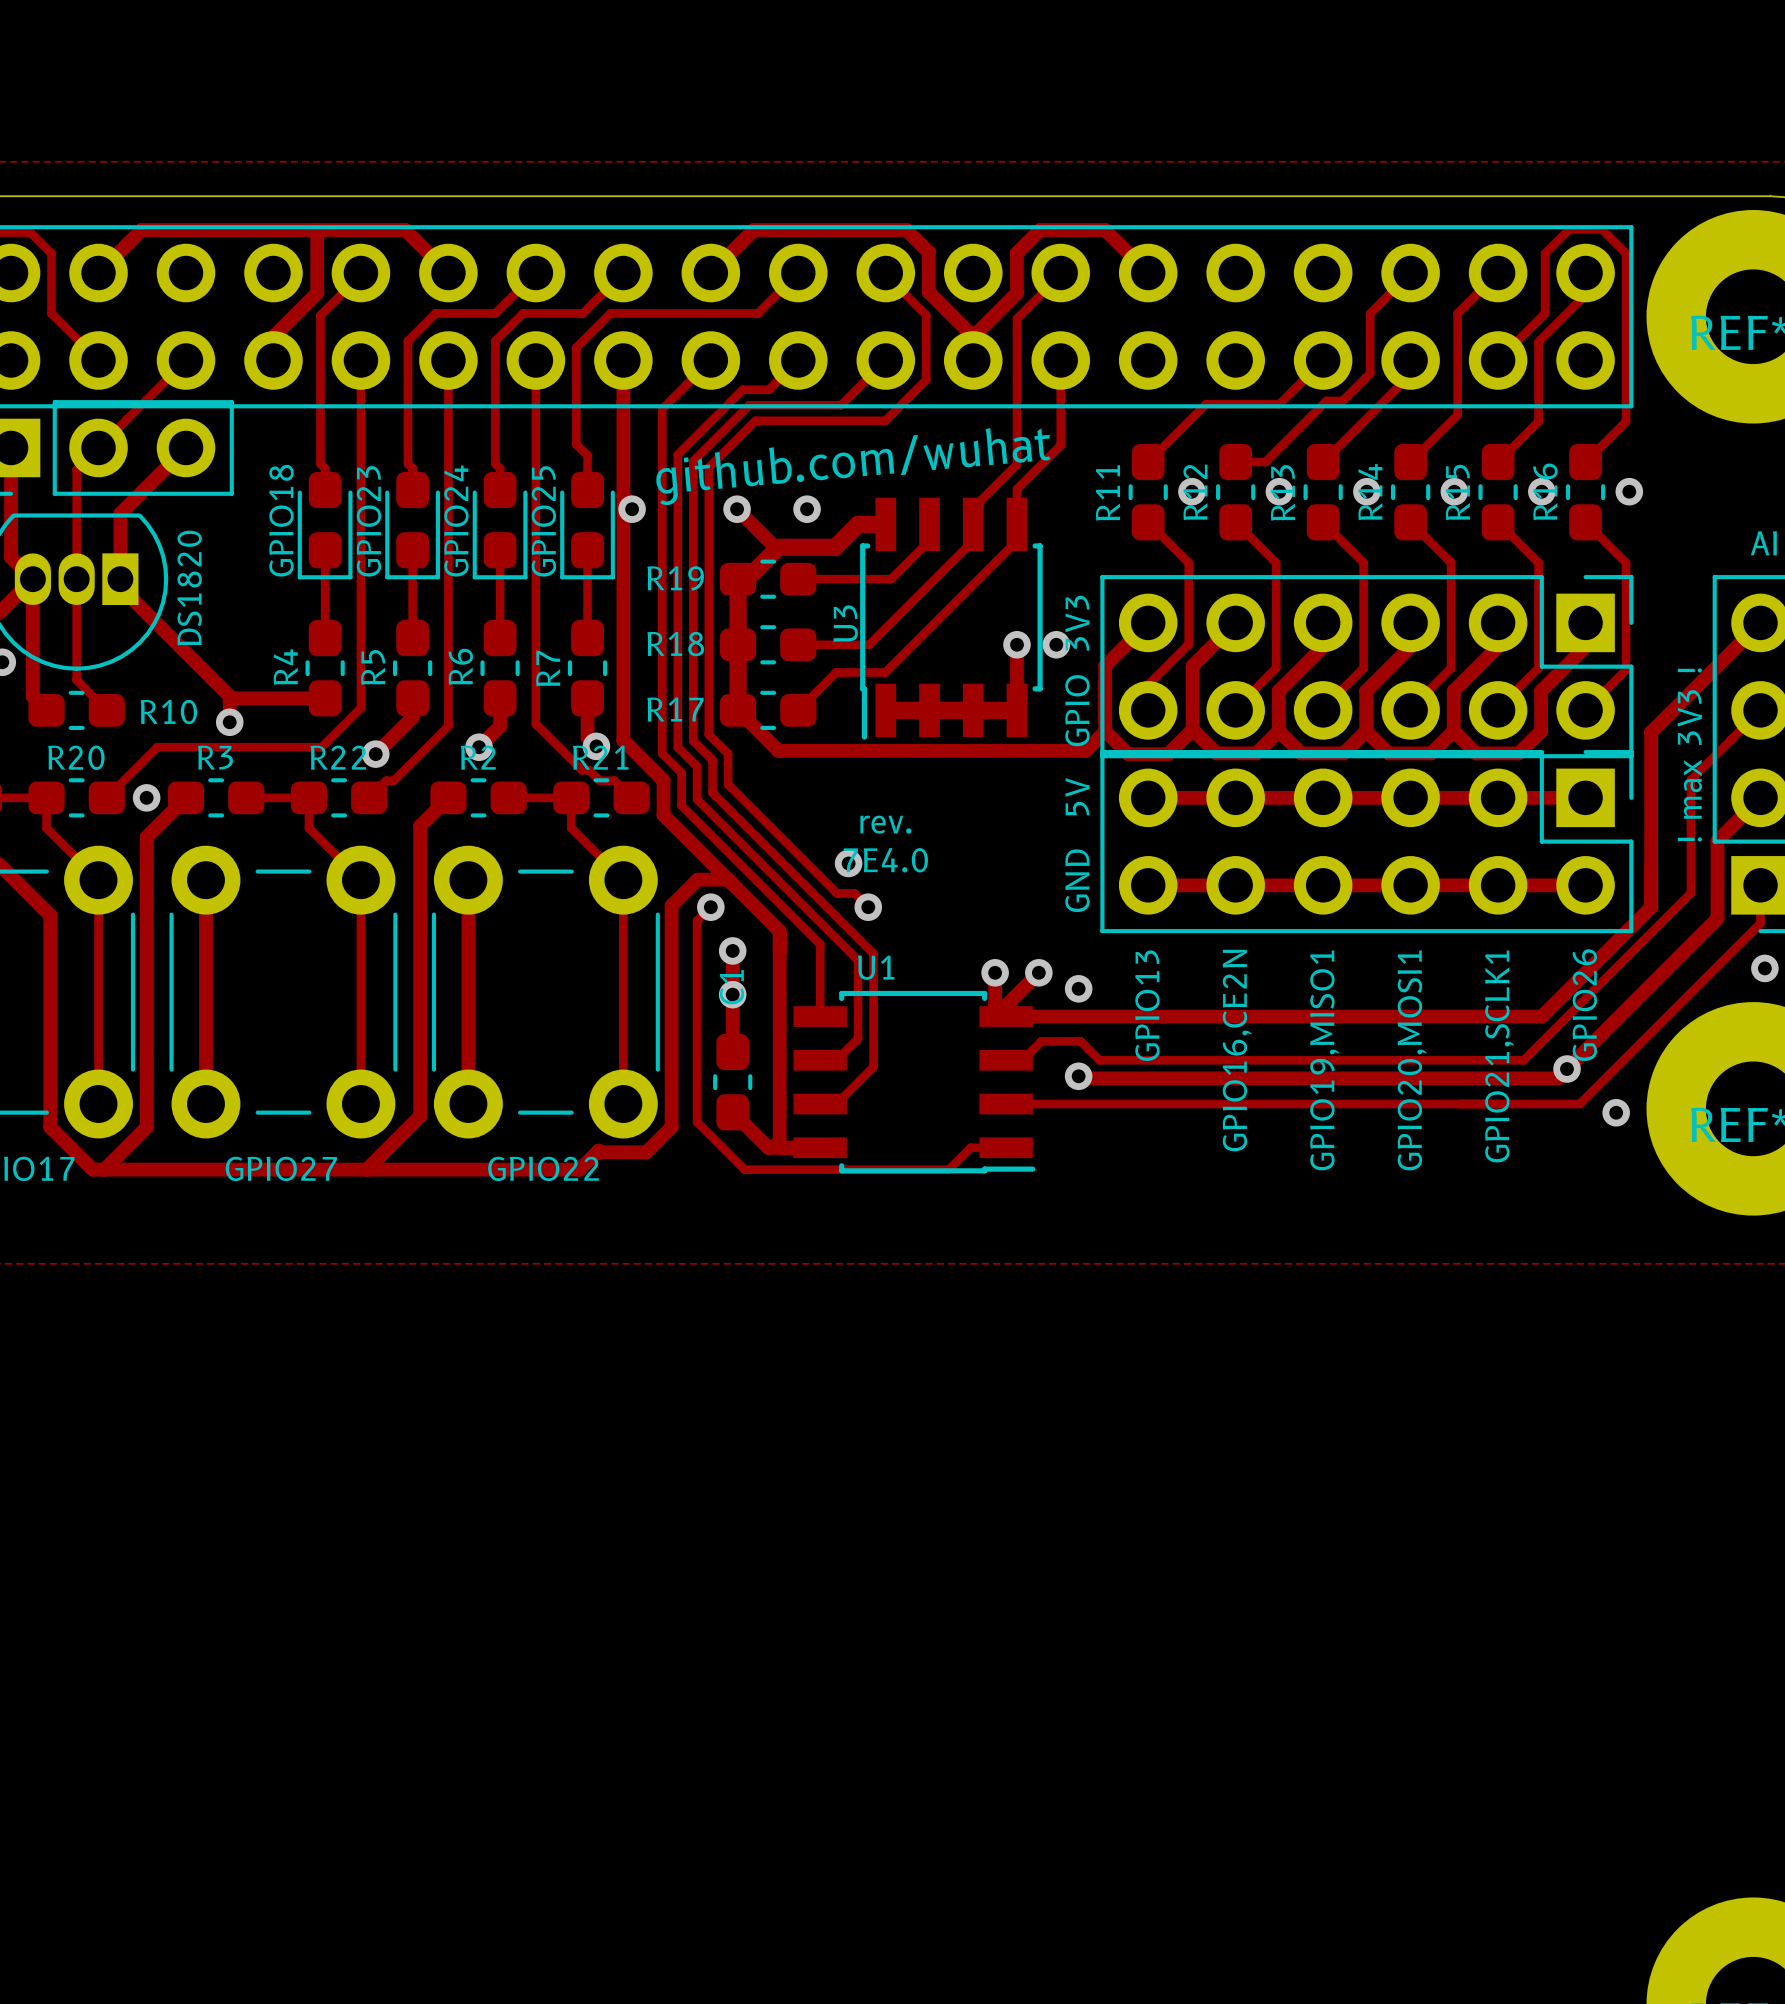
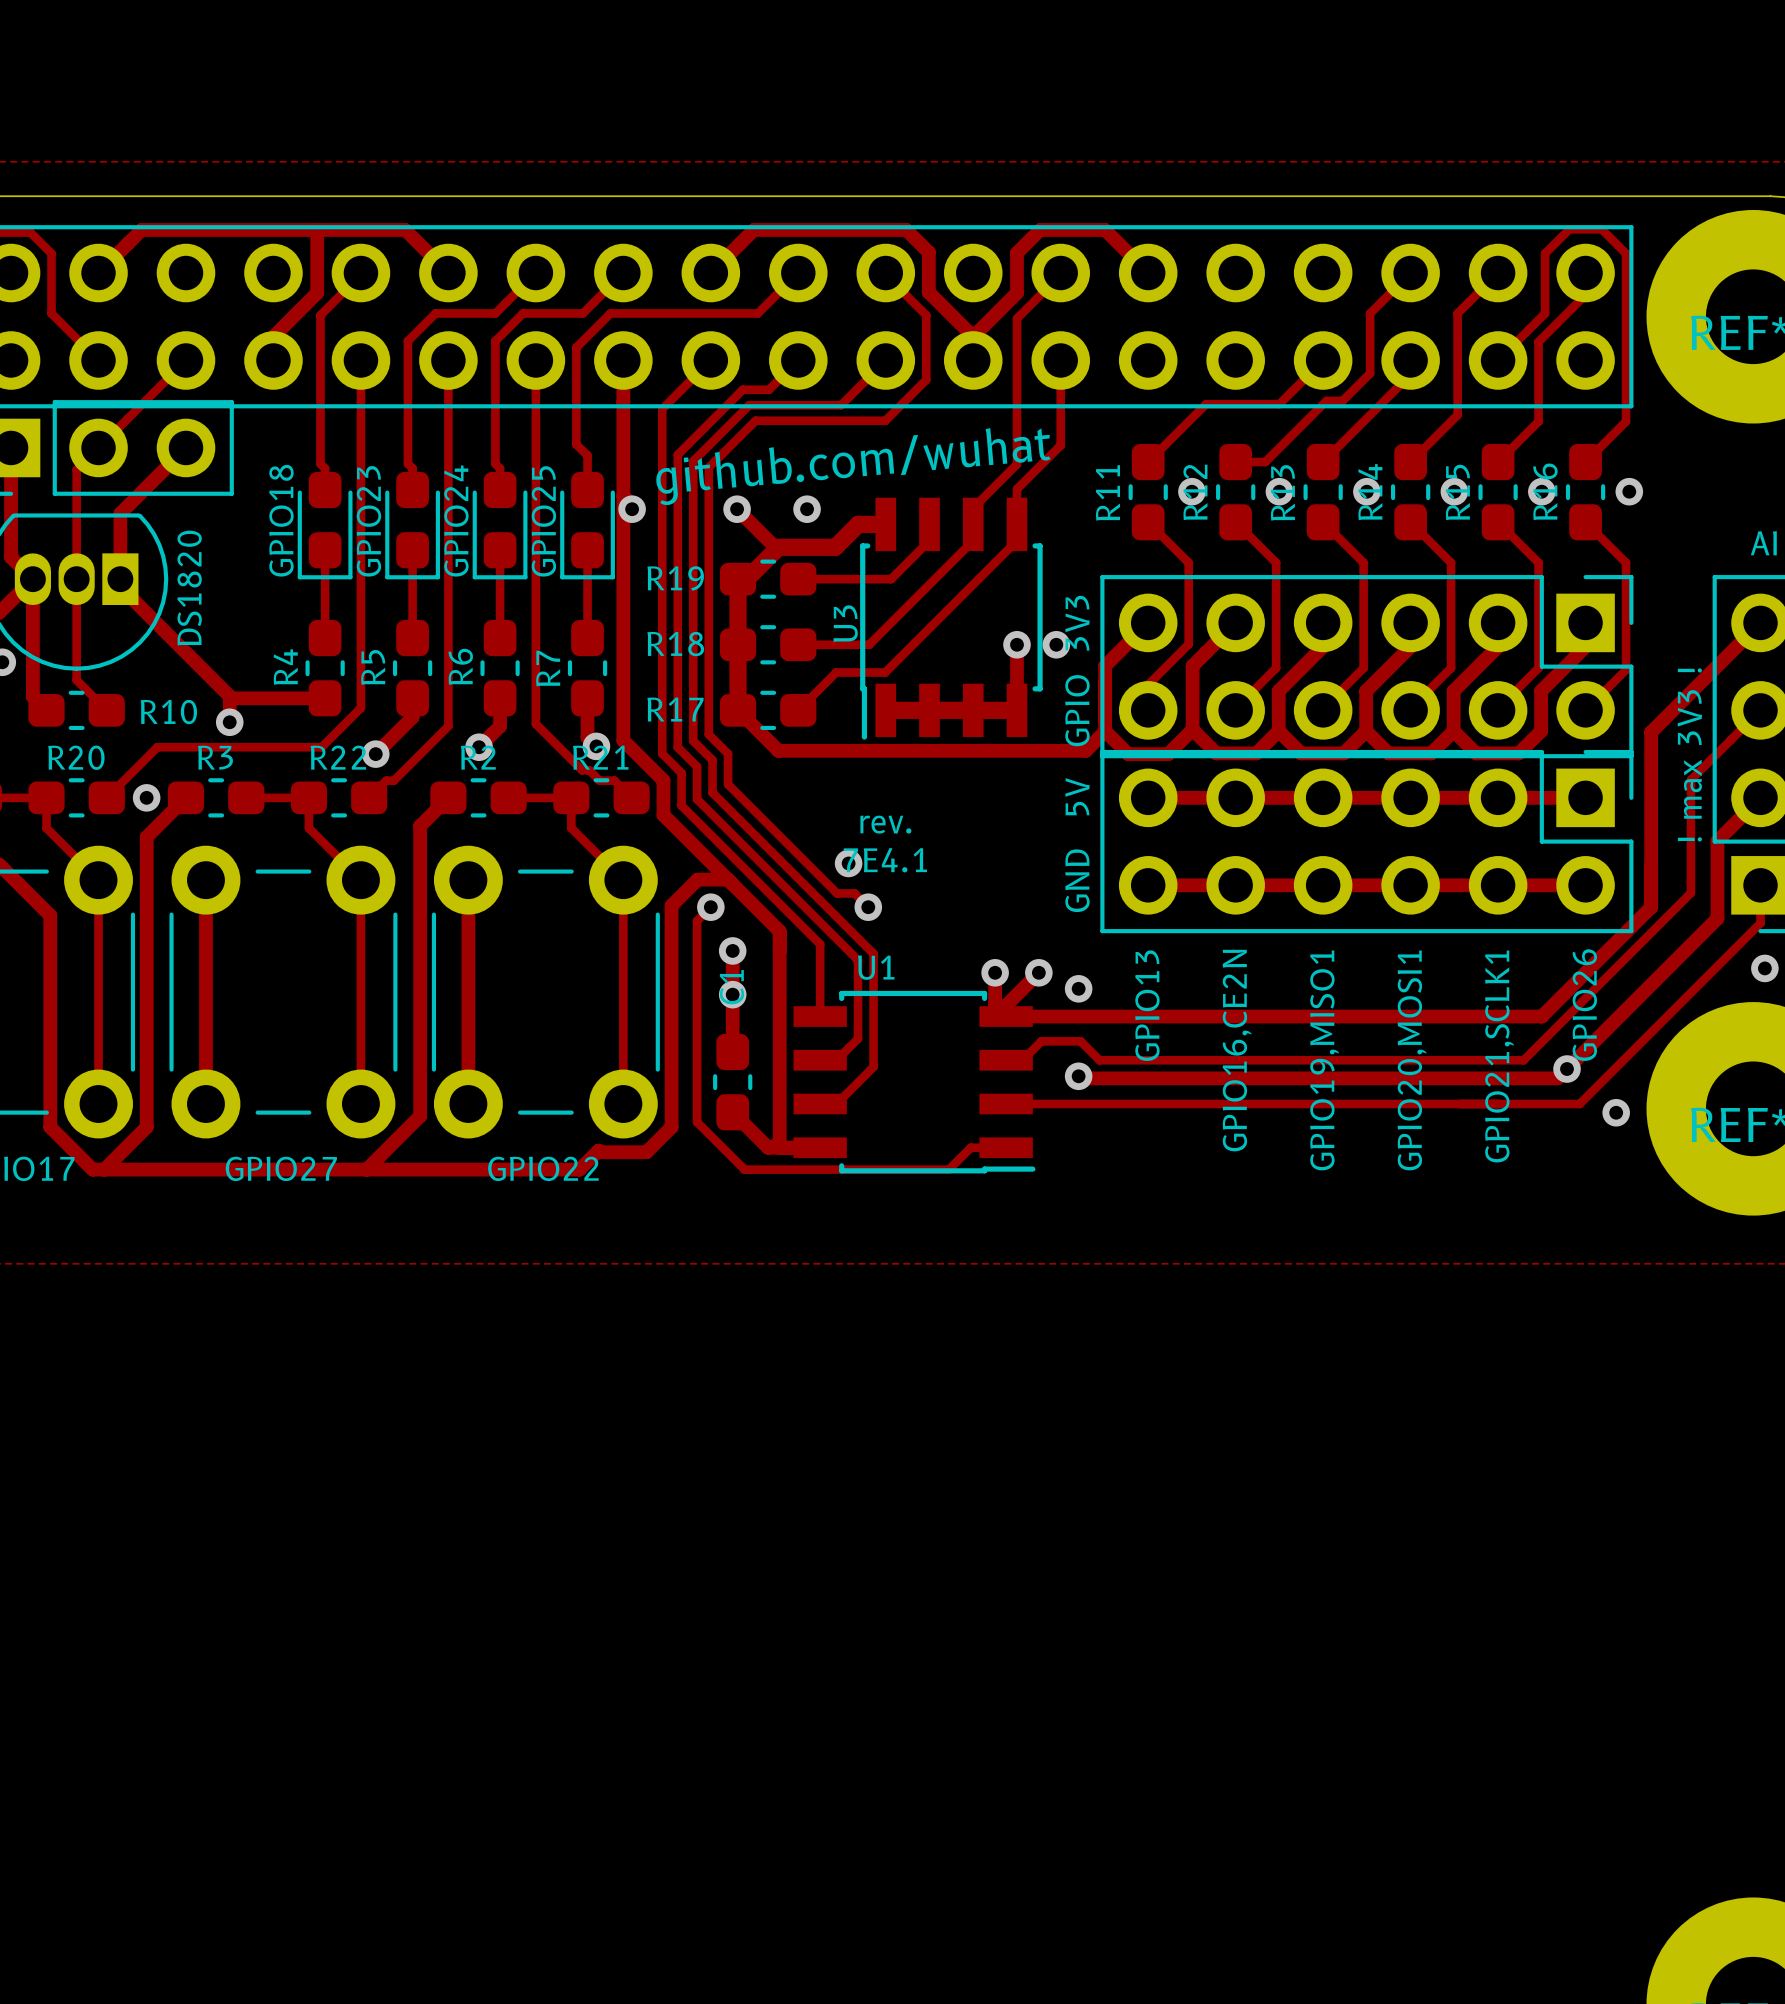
text: 7E4.0 (885, 860) -> 7E4.1 (885, 860)

